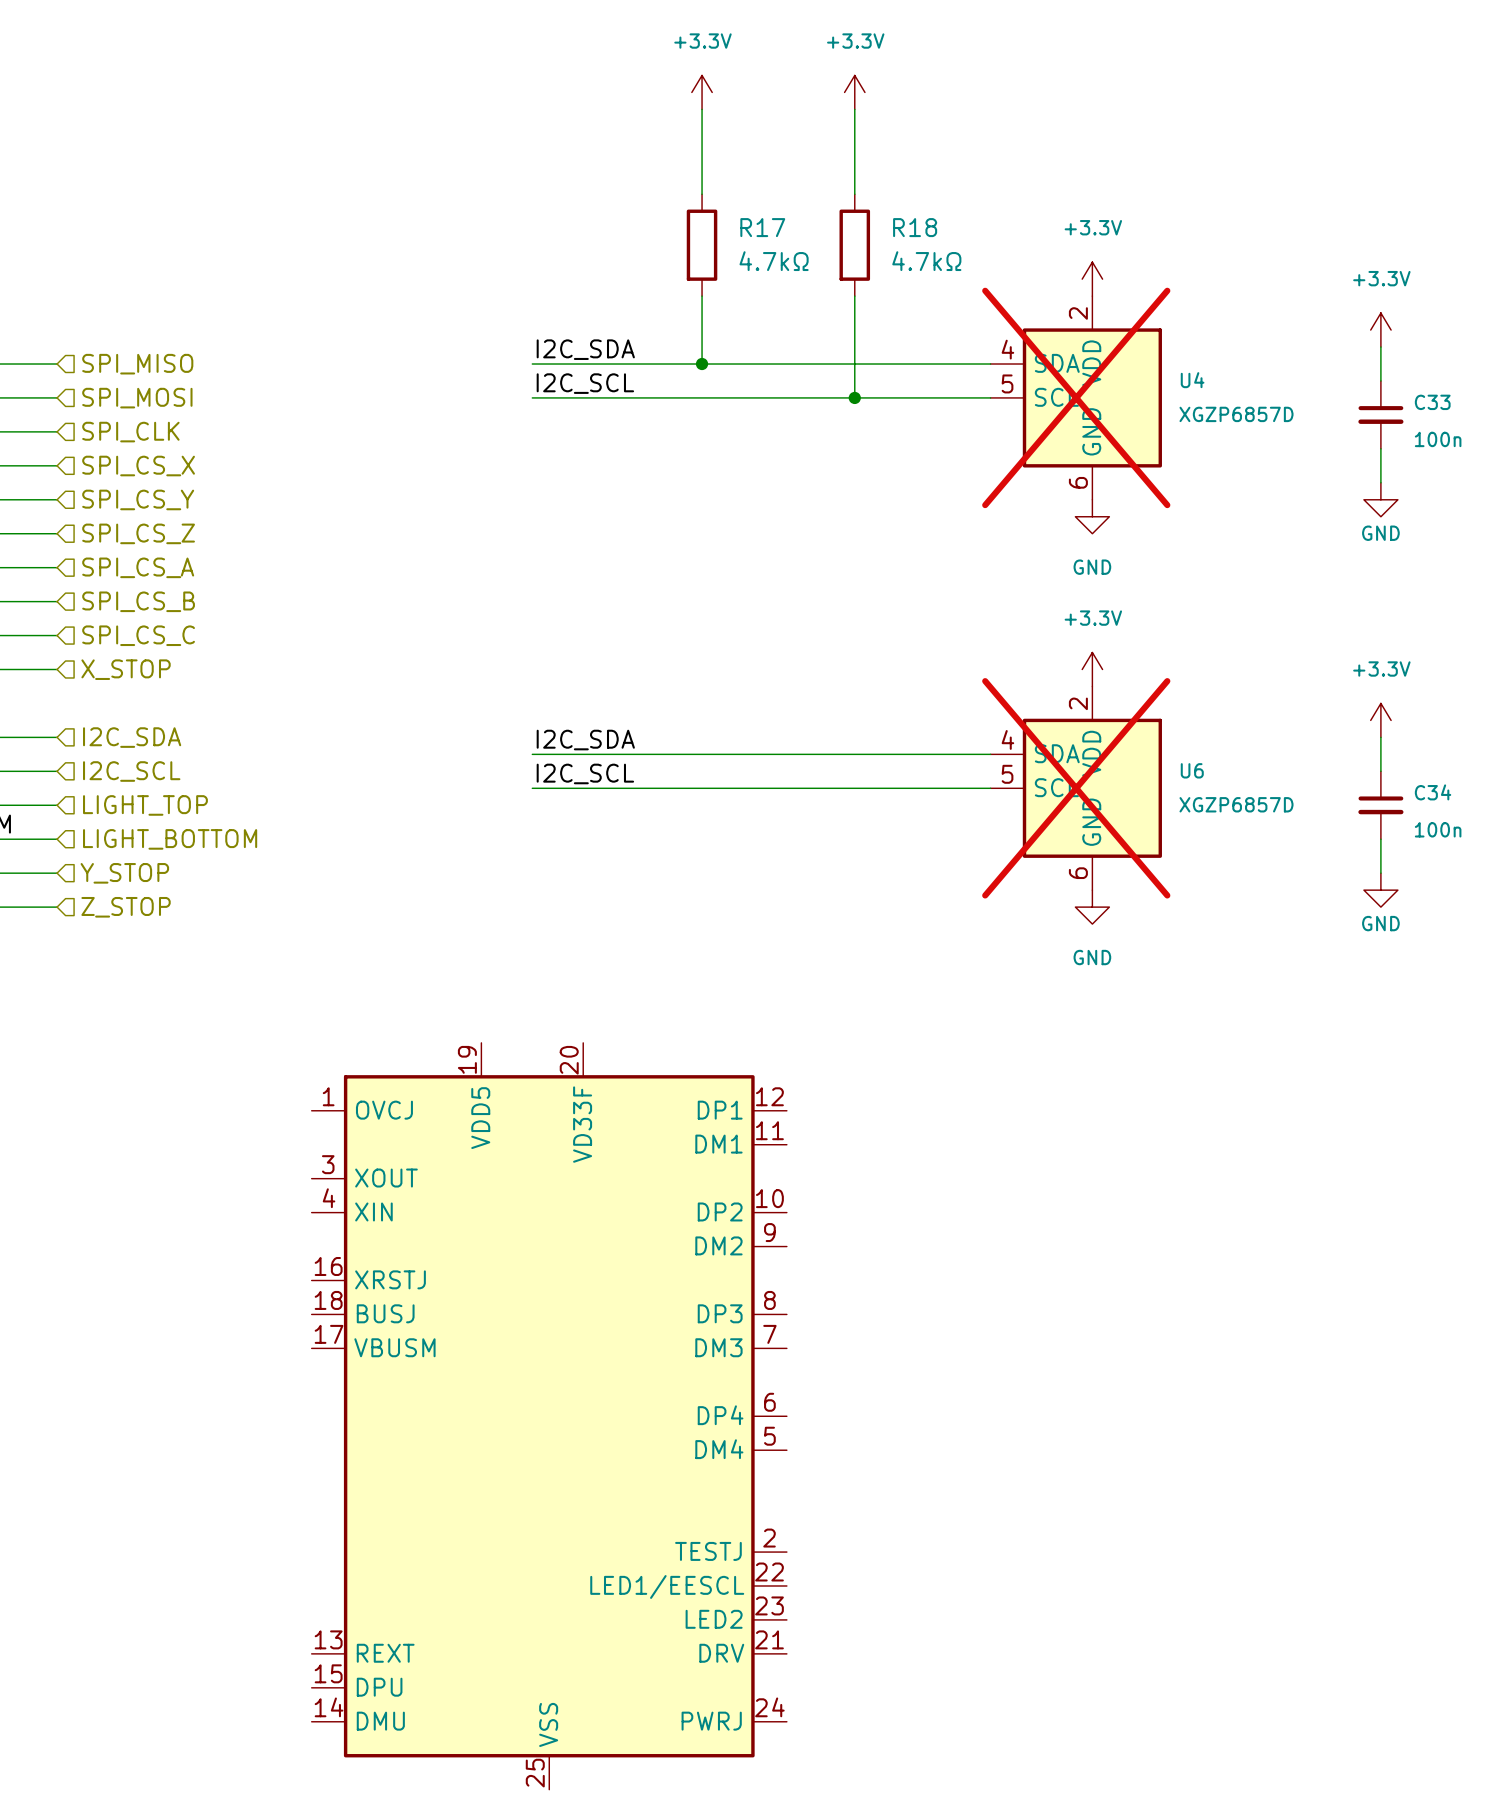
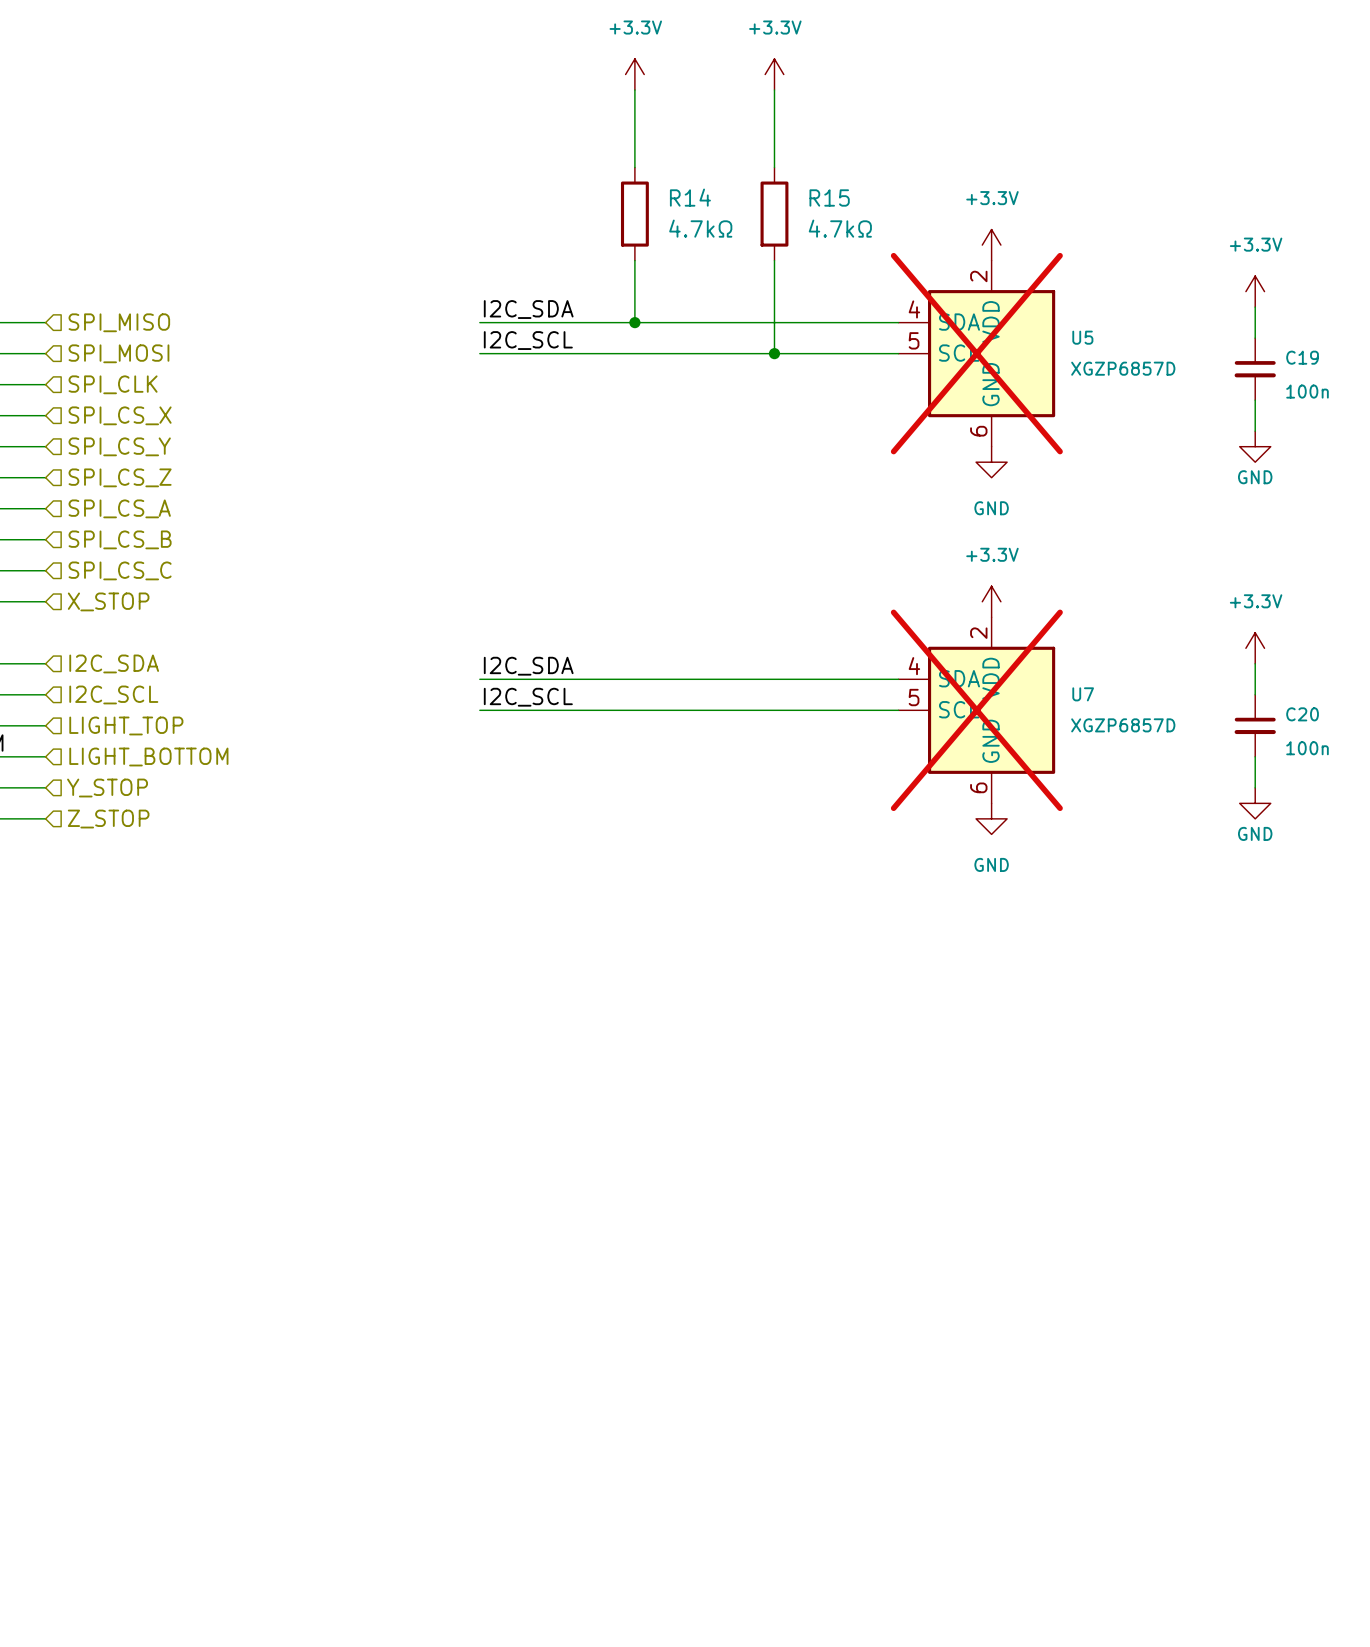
R17 name: R17 (762, 227) -> R14 (690, 197)
R18 name: R18 (915, 227) -> R15 (829, 197)
U4 name: U4 (1192, 380) -> U5 (1082, 337)
C33 name: C33 (1432, 402) -> C19 (1302, 357)
U6 name: U6 (1192, 770) -> U7 (1083, 694)
C34 name: C34 (1433, 792) -> C20 (1302, 714)
part: (549, 1416) -> none

